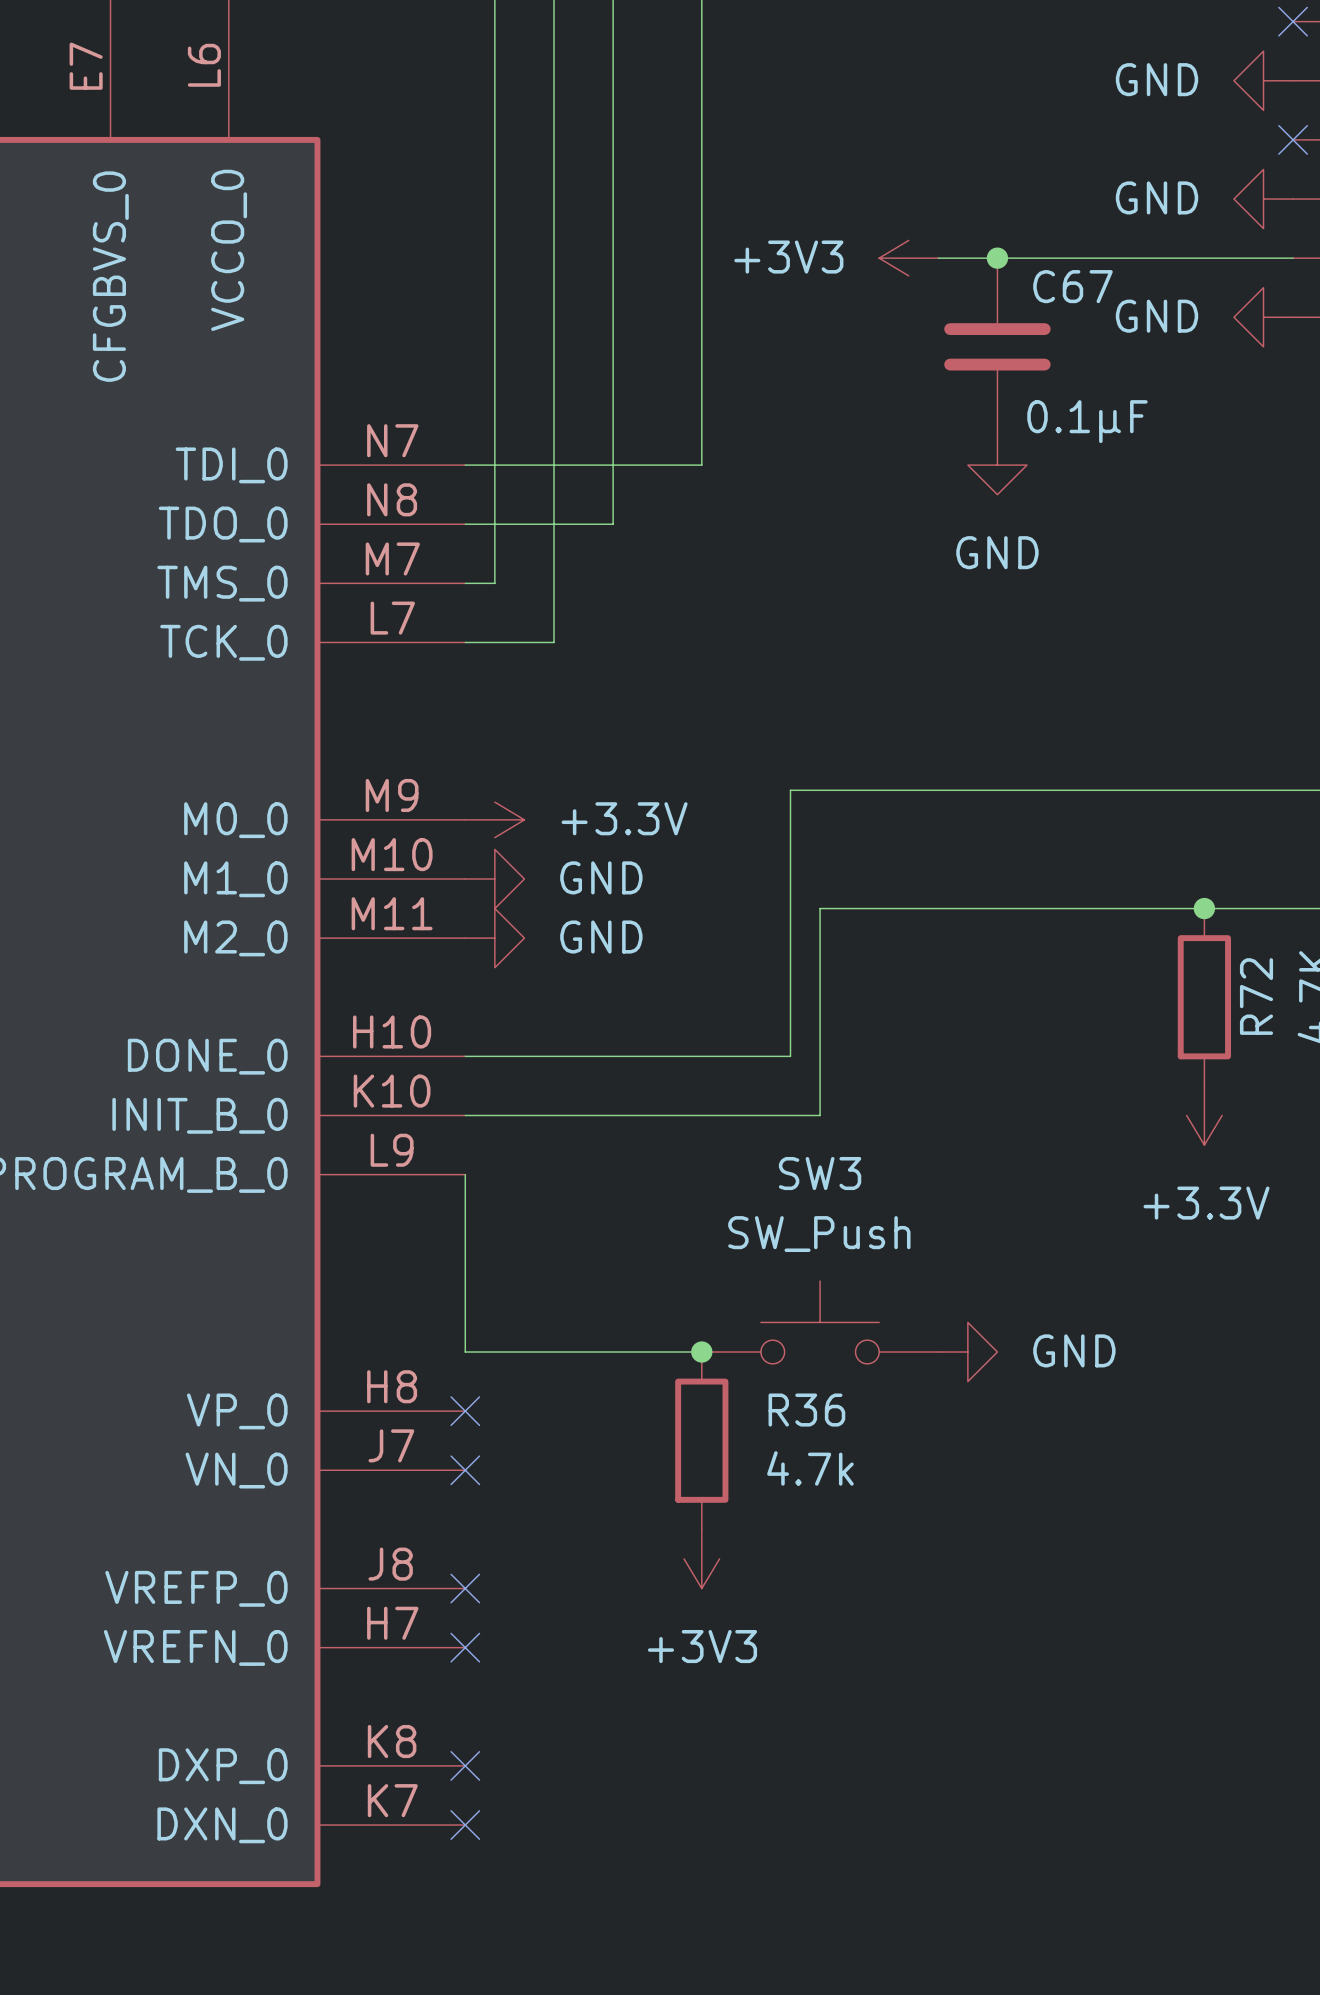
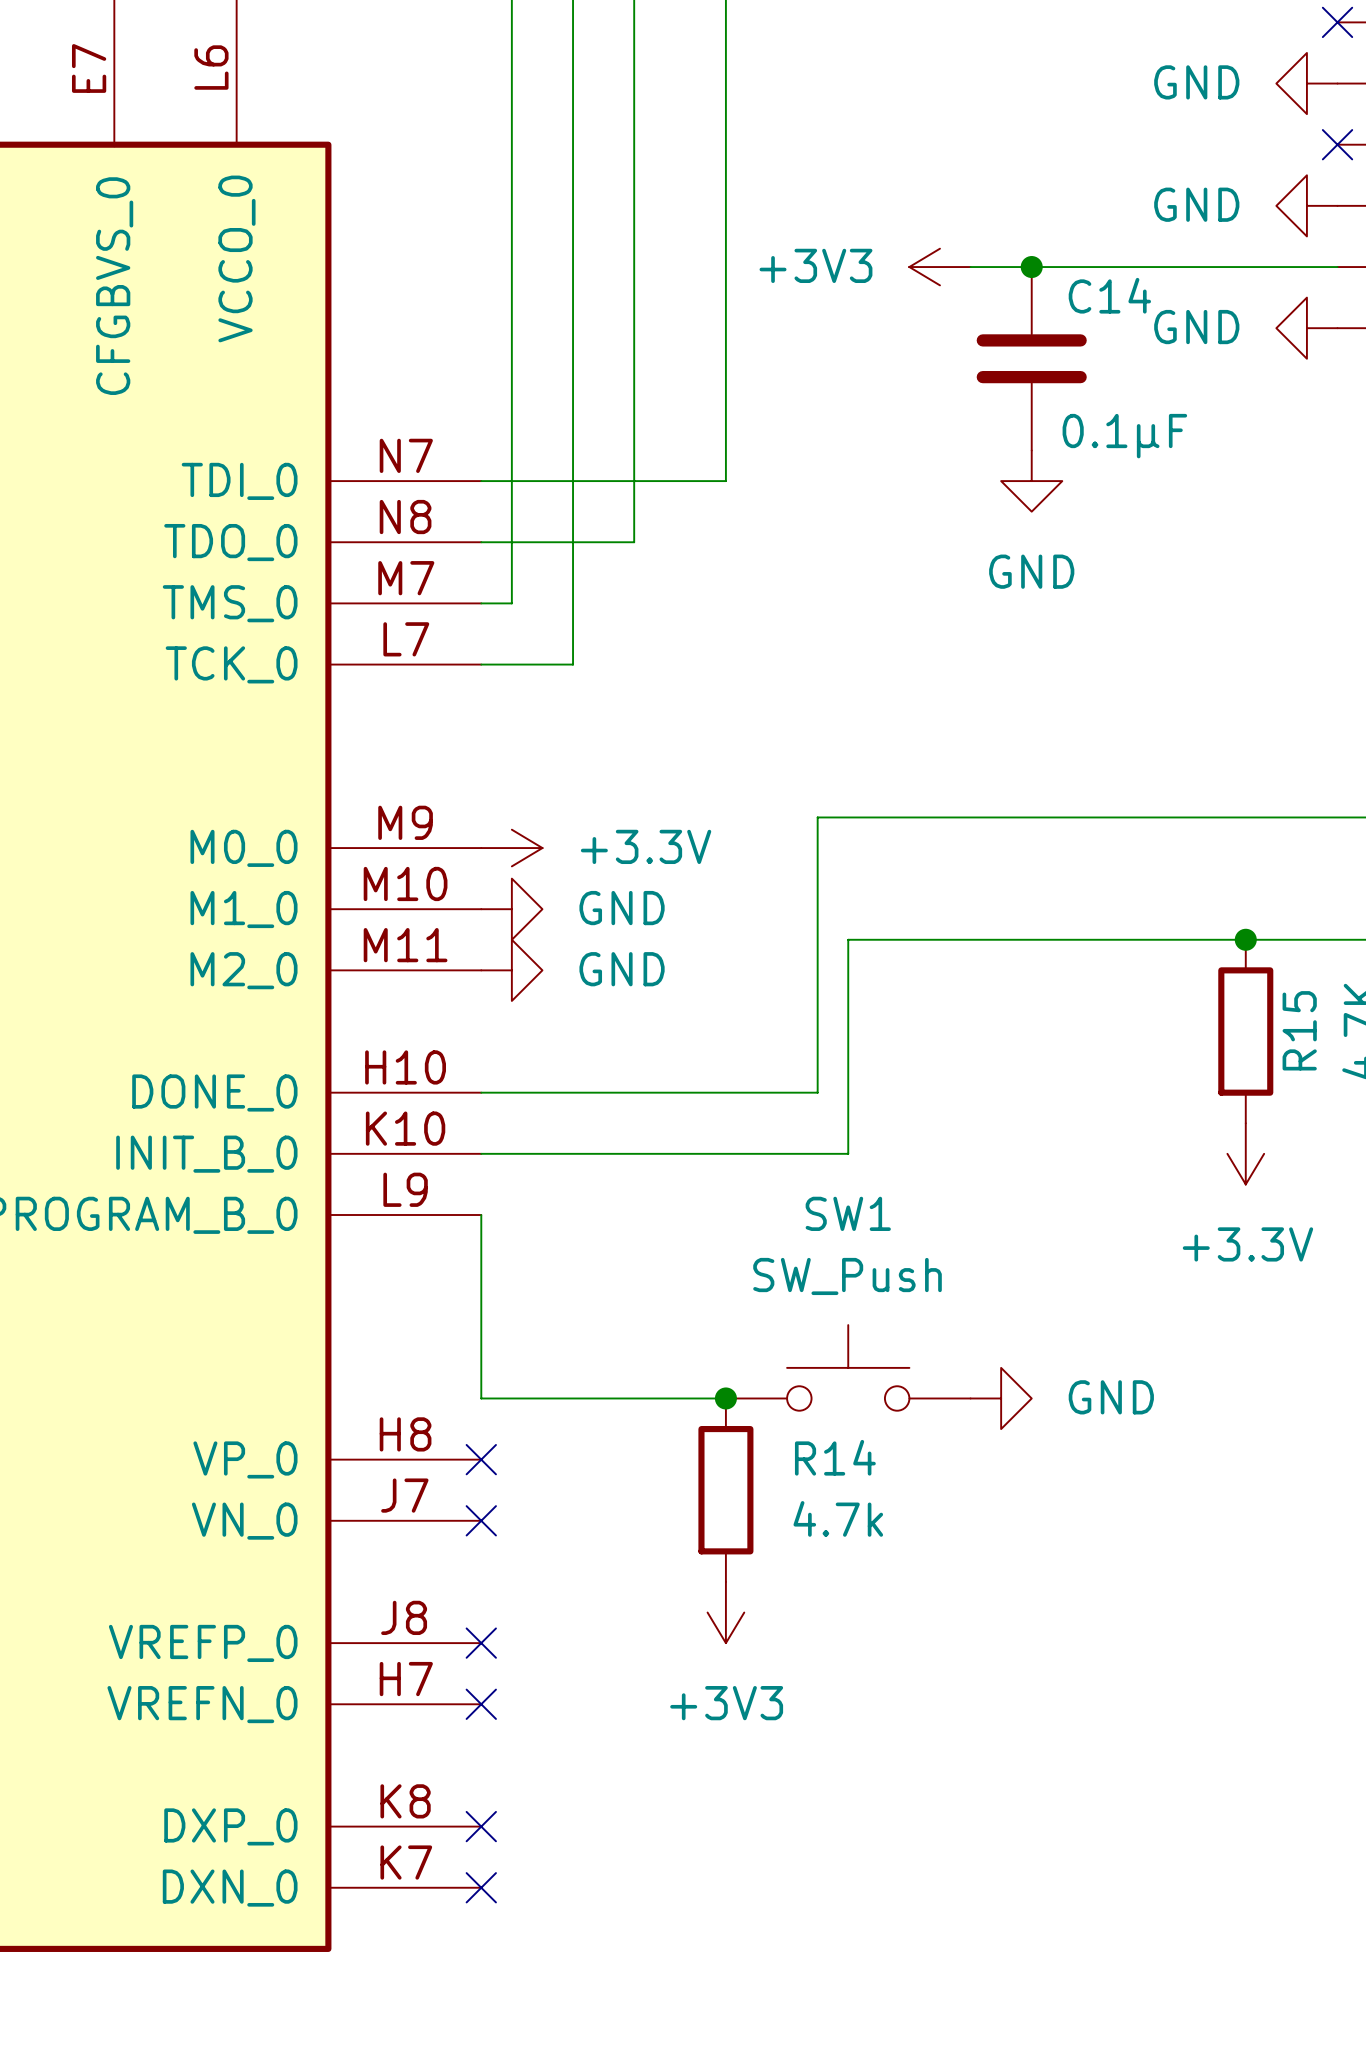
C67 name: C67 (1072, 286) -> C14 (1109, 295)
R72 name: R72 (1256, 996) -> R15 (1299, 1030)
SW3 name: SW3 (820, 1173) -> SW1 (848, 1213)
R36 name: R36 (806, 1410) -> R14 (835, 1457)

